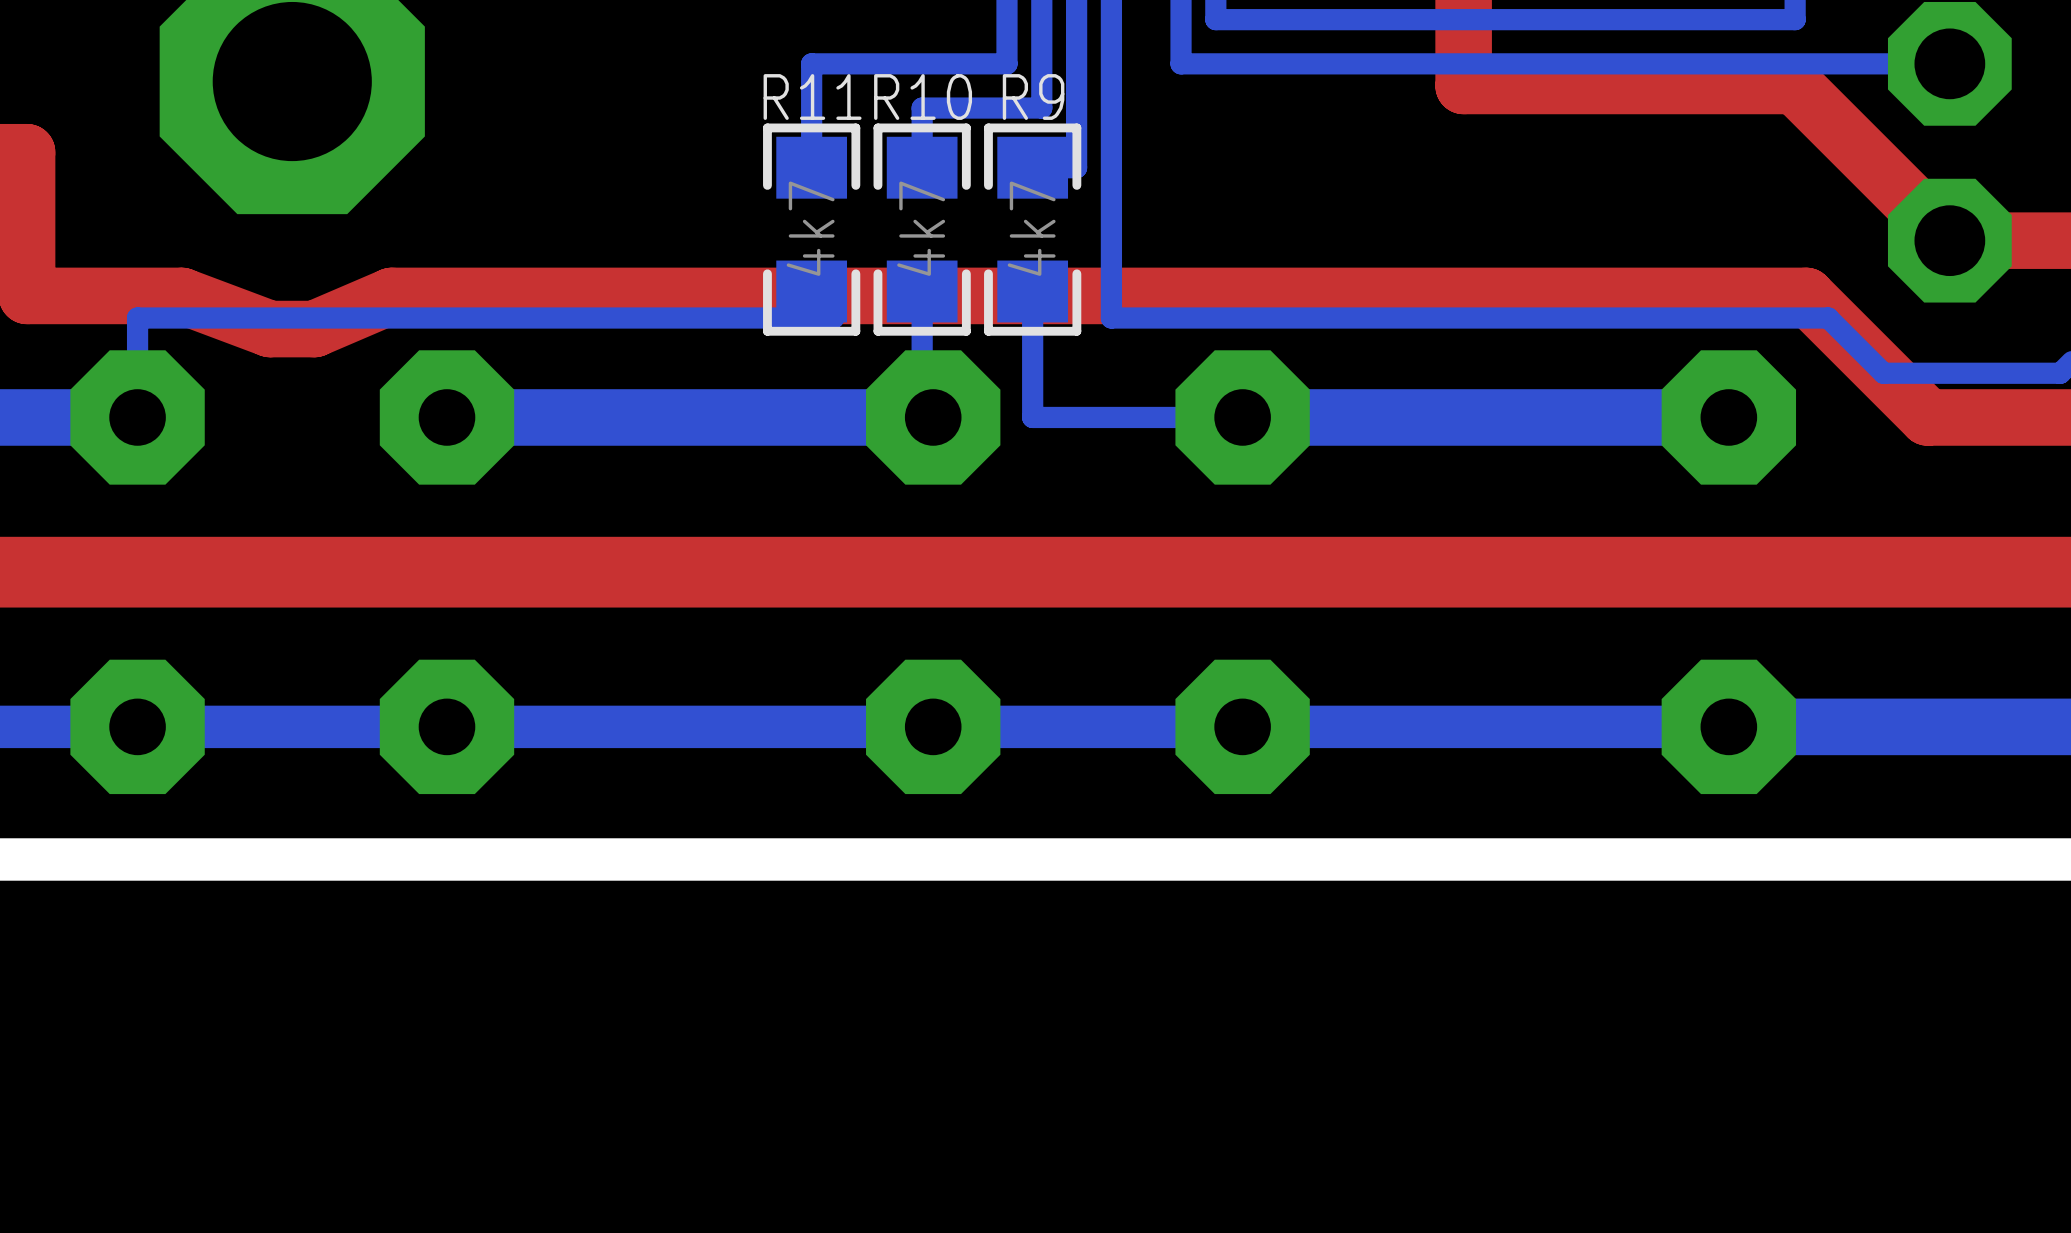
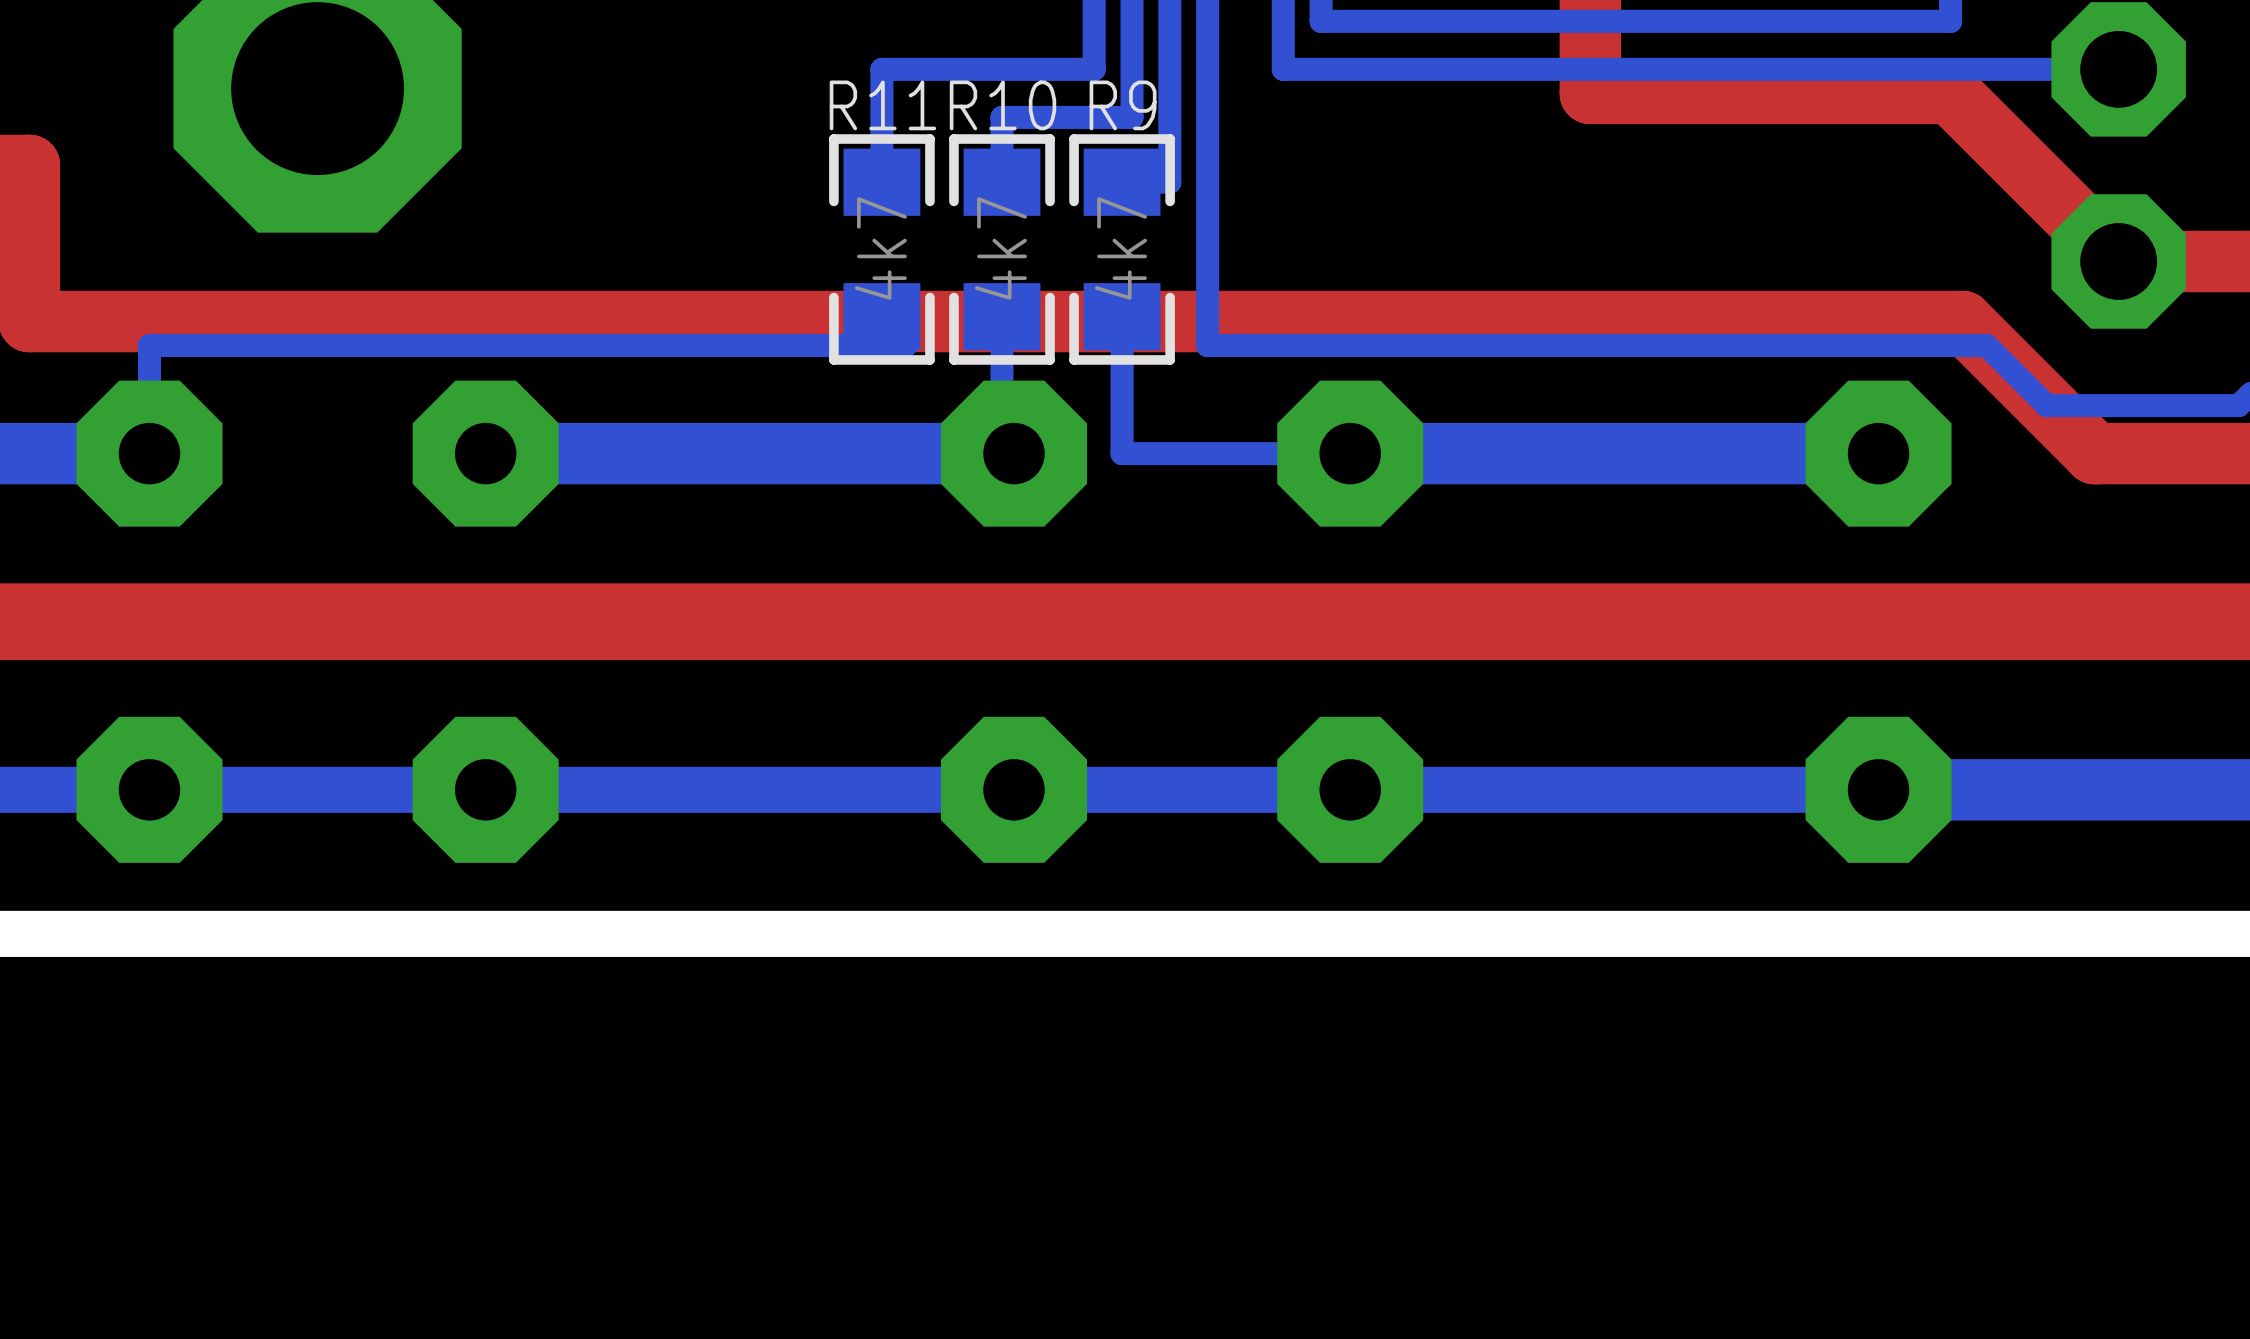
top track: (391, 295) (314, 329) (270, 329) (181, 295) -> (425, 321) (197, 321)

